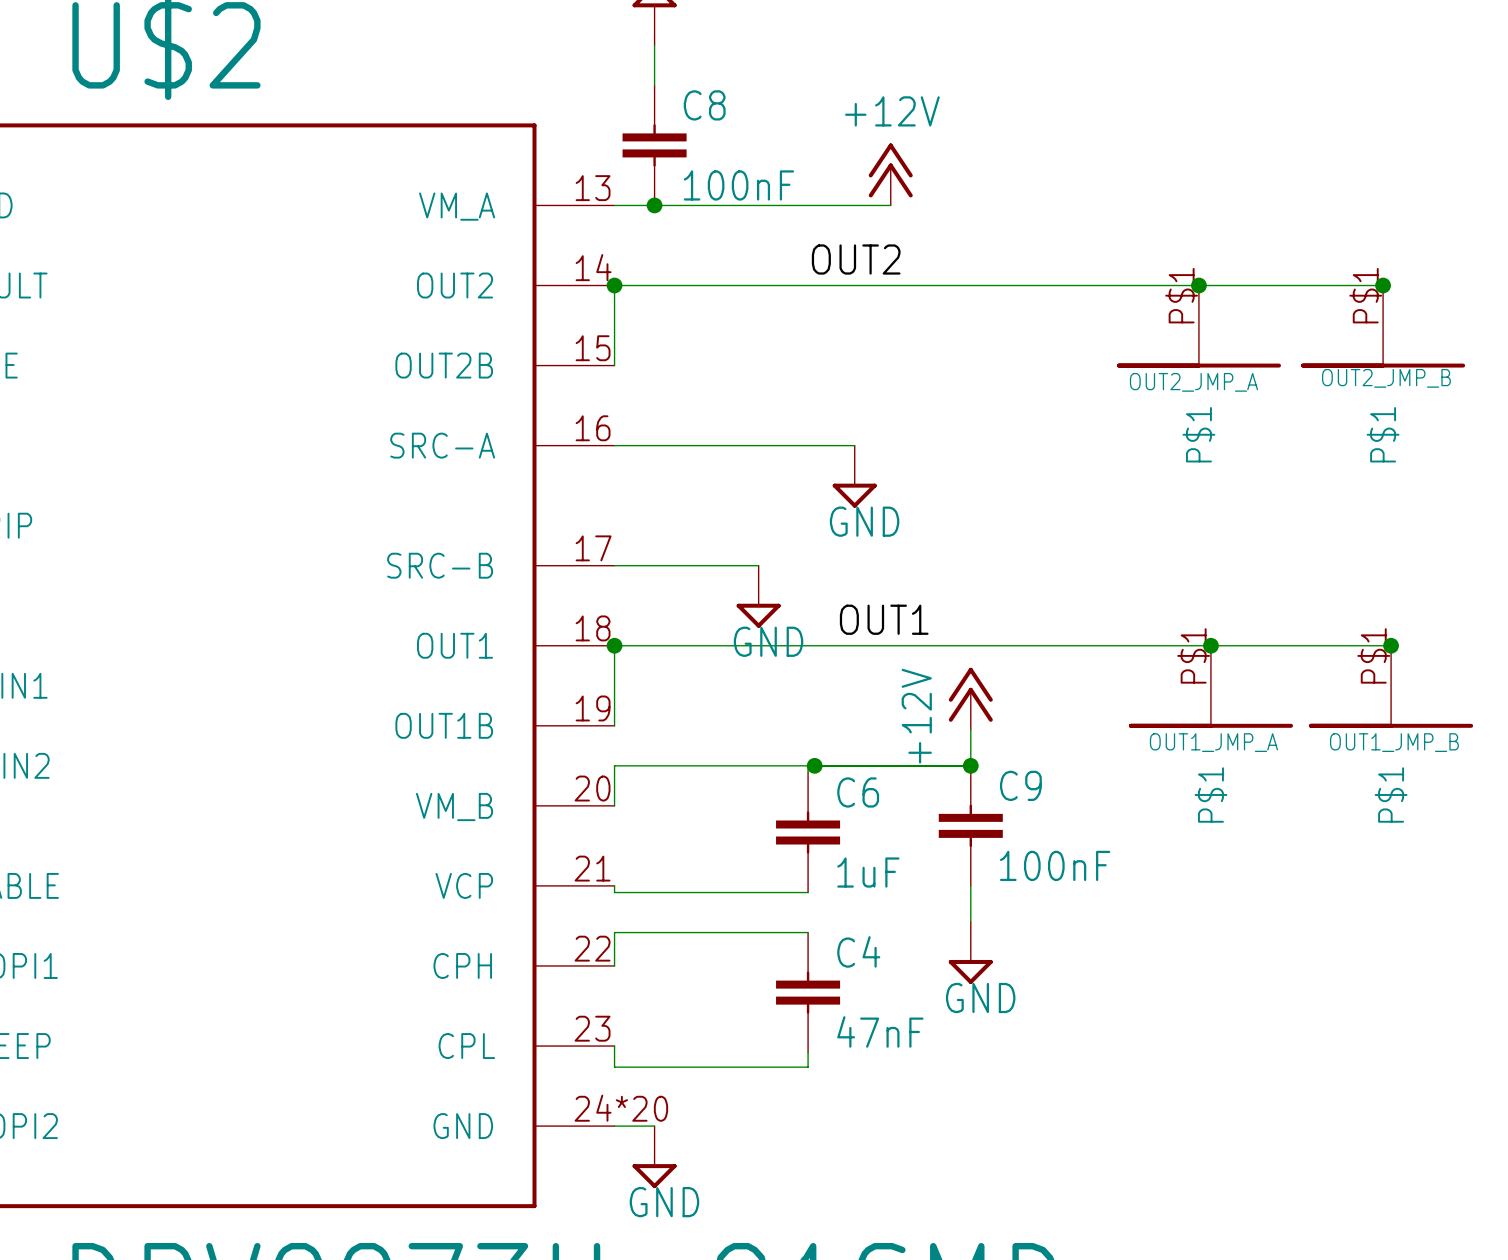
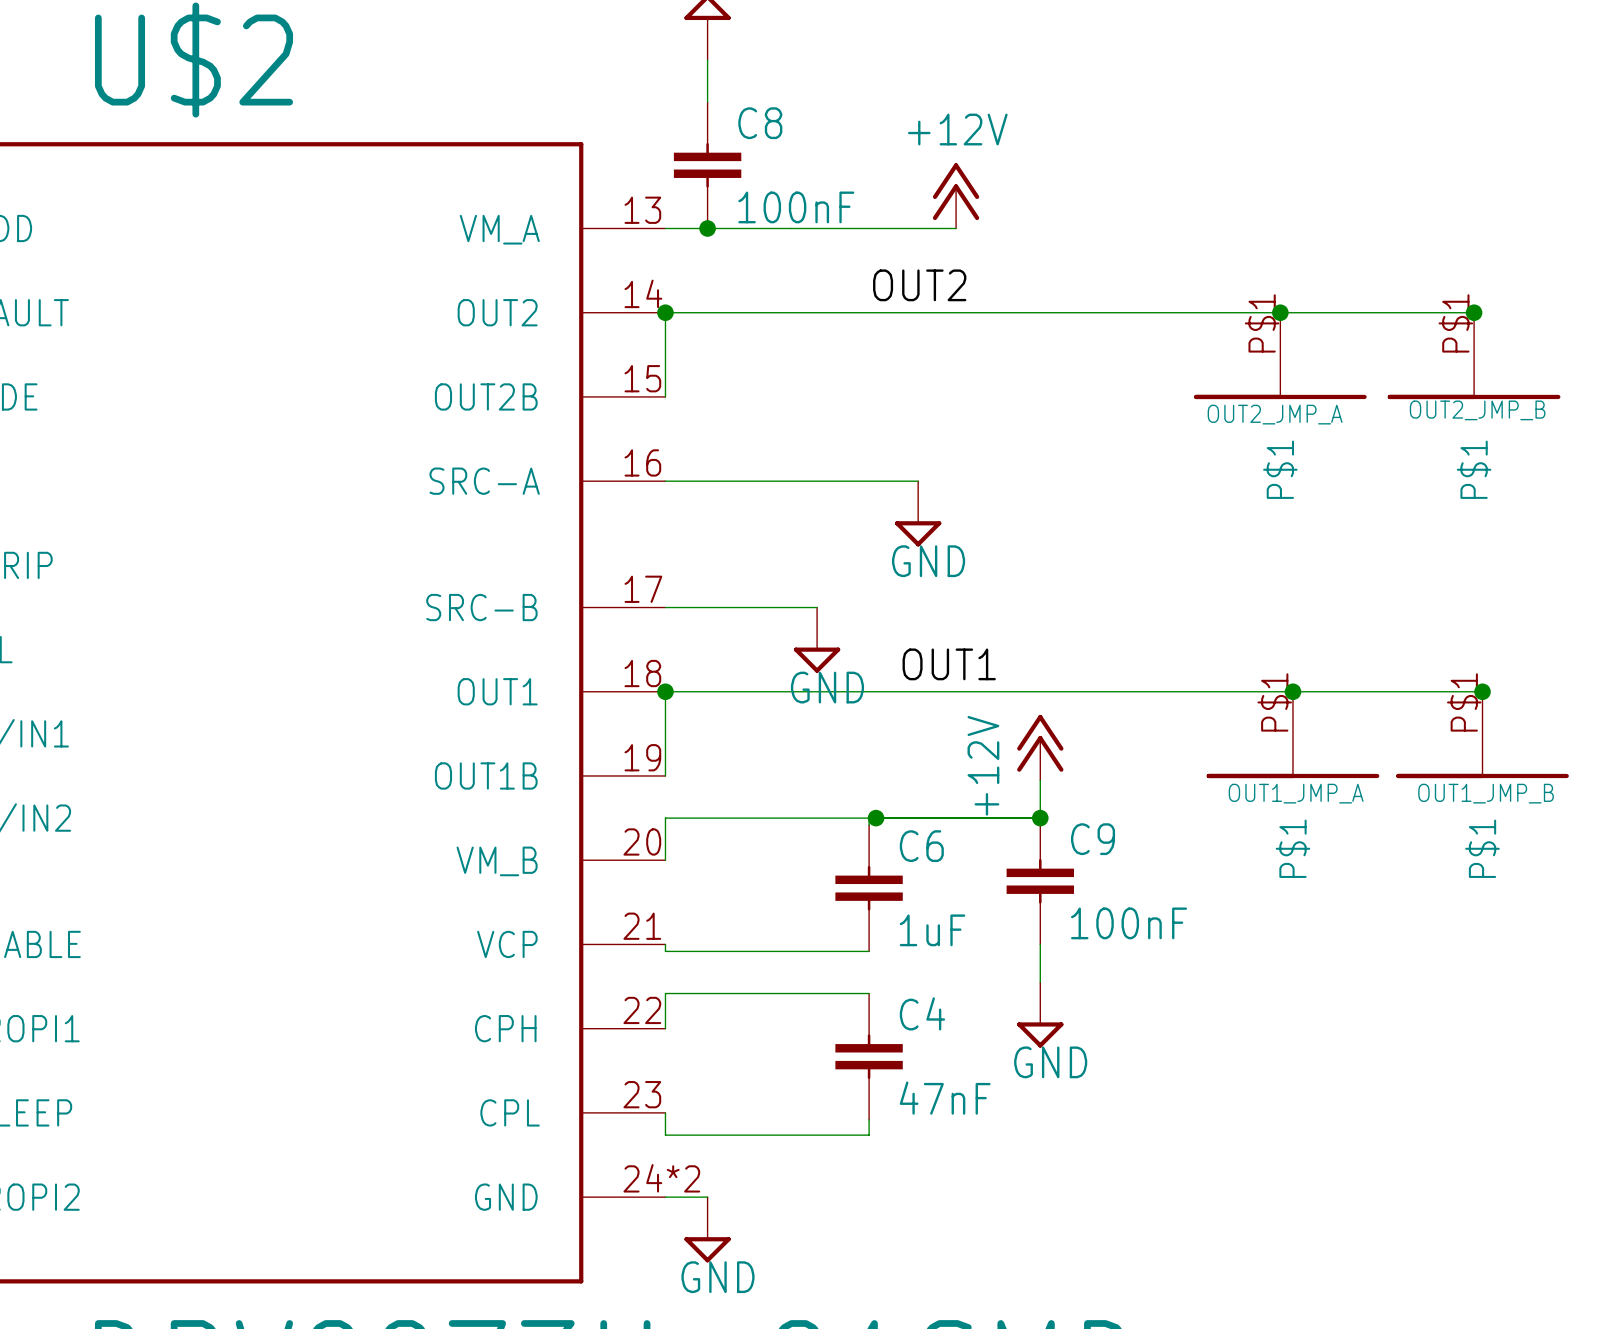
U$2 pin number: 24*20 (621, 1108) -> 24*2 (661, 1178)

